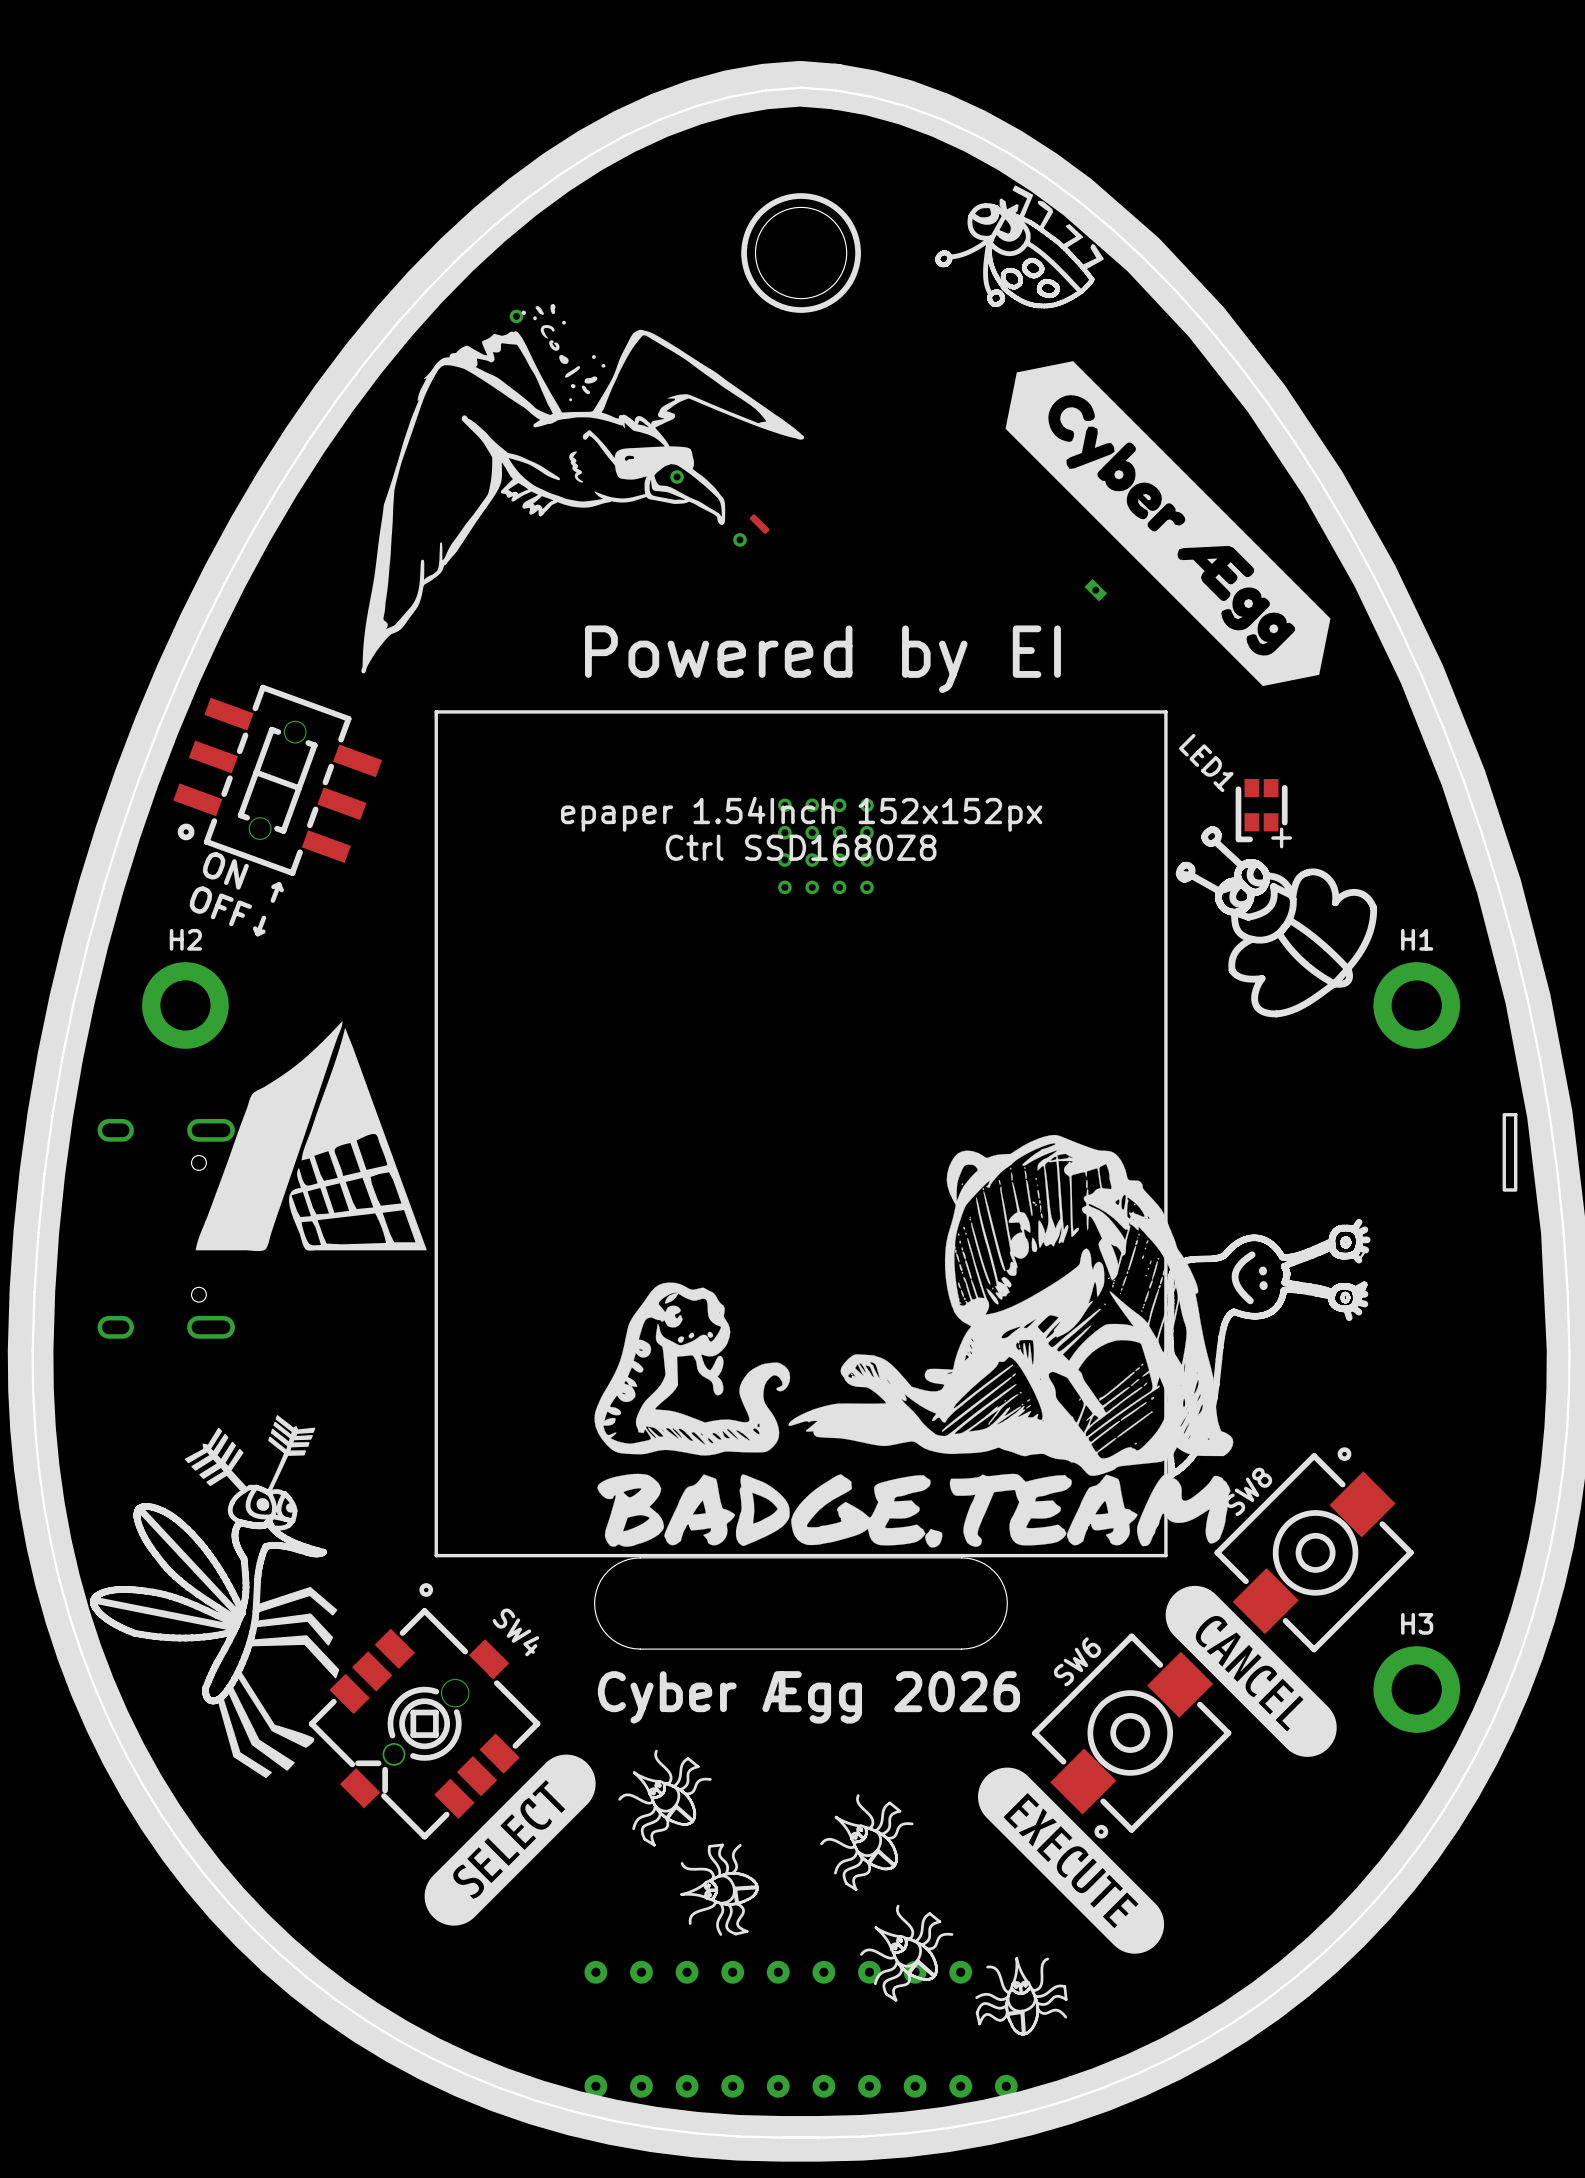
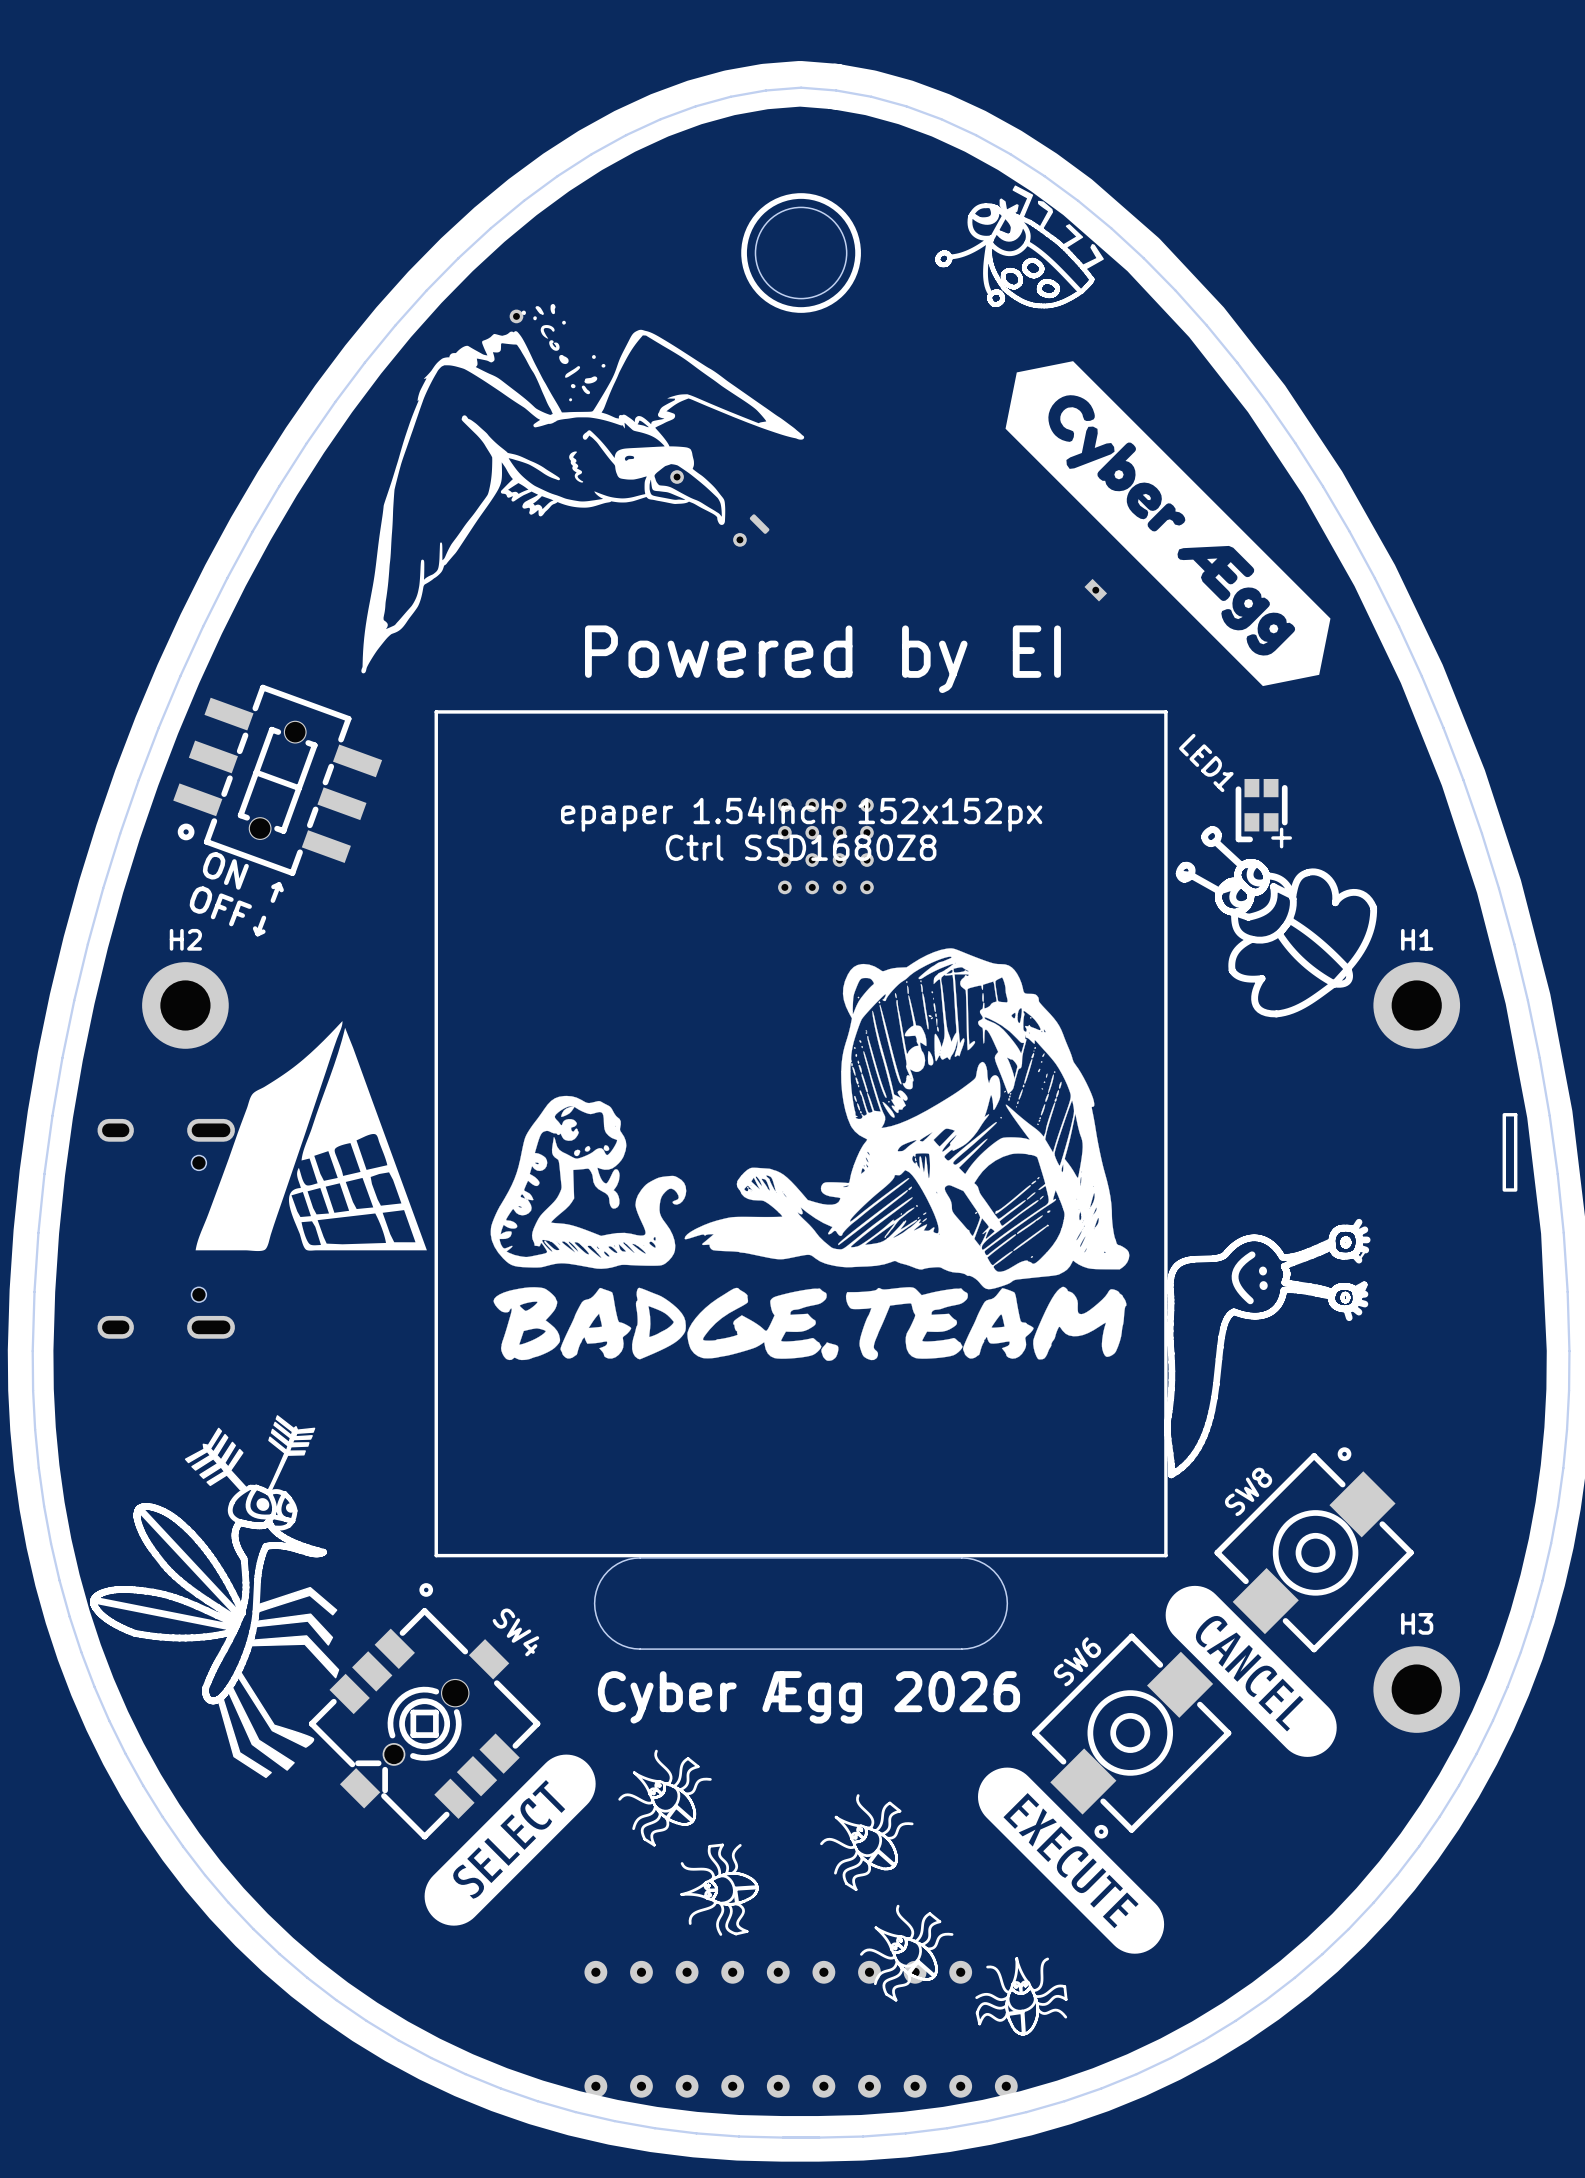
drawing position: (913, 1341) -> (810, 1154)

